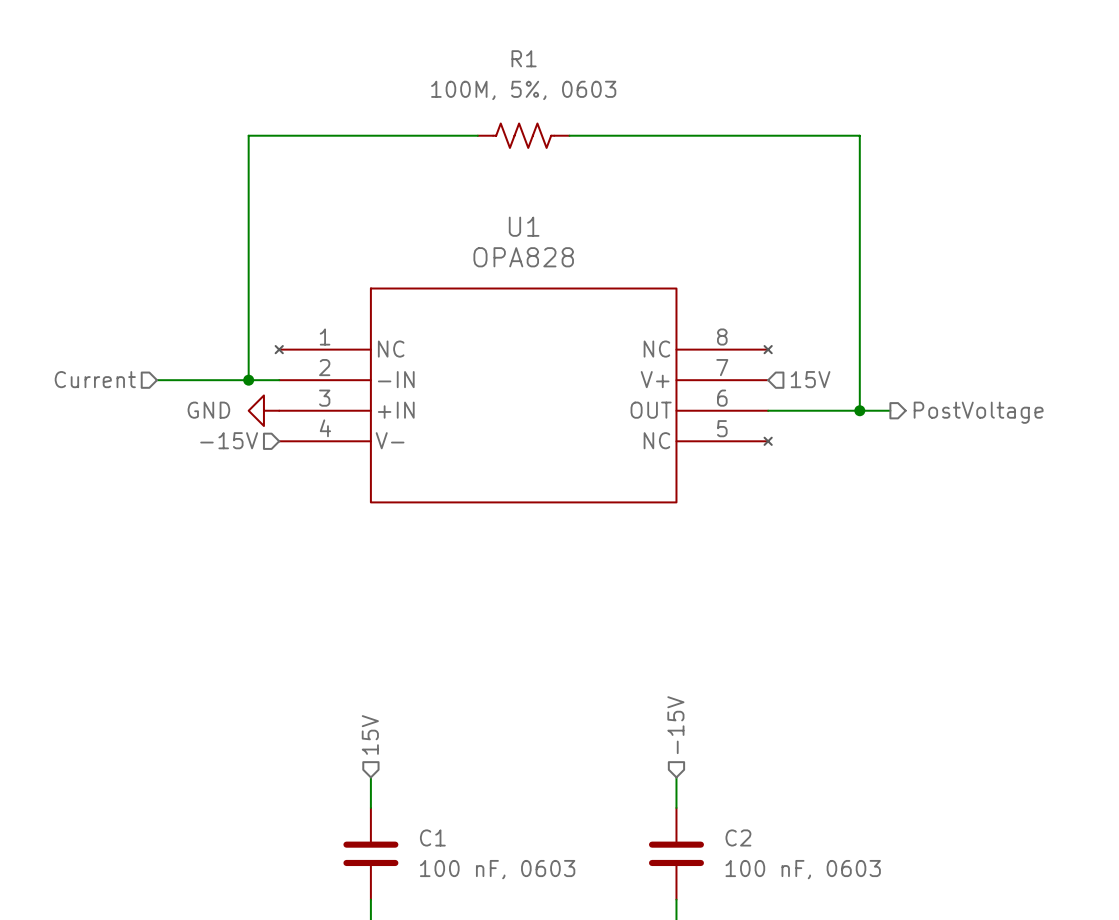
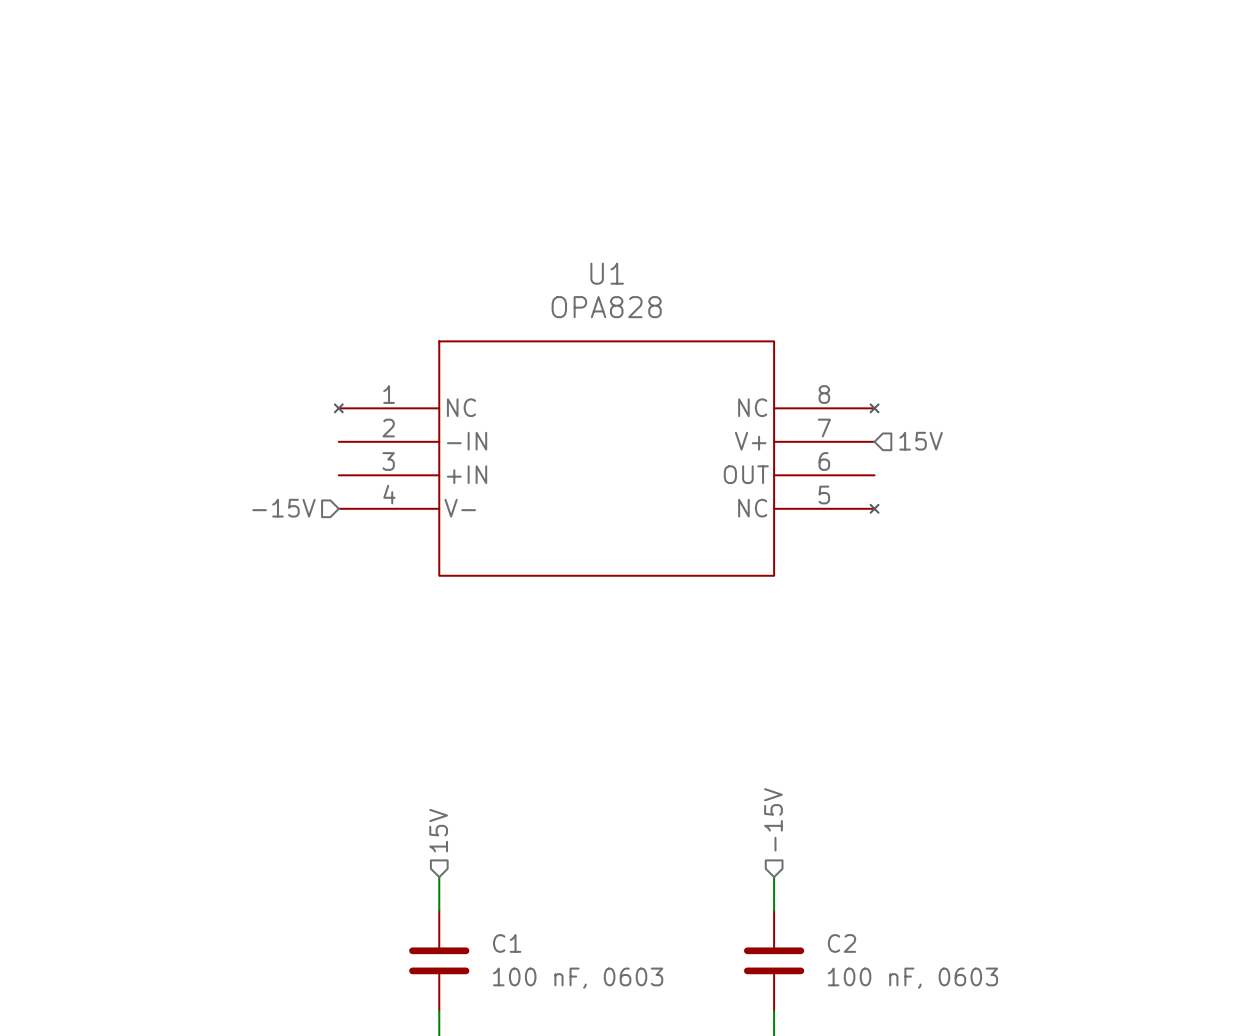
wire: (477, 135) (248, 135) (248, 380) -> none
R1: 100M, 5%, 0603 (523, 135) -> none
wire: (569, 135) (859, 135) (859, 410) -> none
hierarchical label: Current (95, 379) -> none
wire: (157, 380) (279, 380) -> none
junction: (248, 380) -> none
power symbol: GND (263, 410) -> none
wire: (768, 410) (890, 410) -> none
junction: (859, 410) -> none
hierarchical label: PostVoltage (978, 412) -> none

